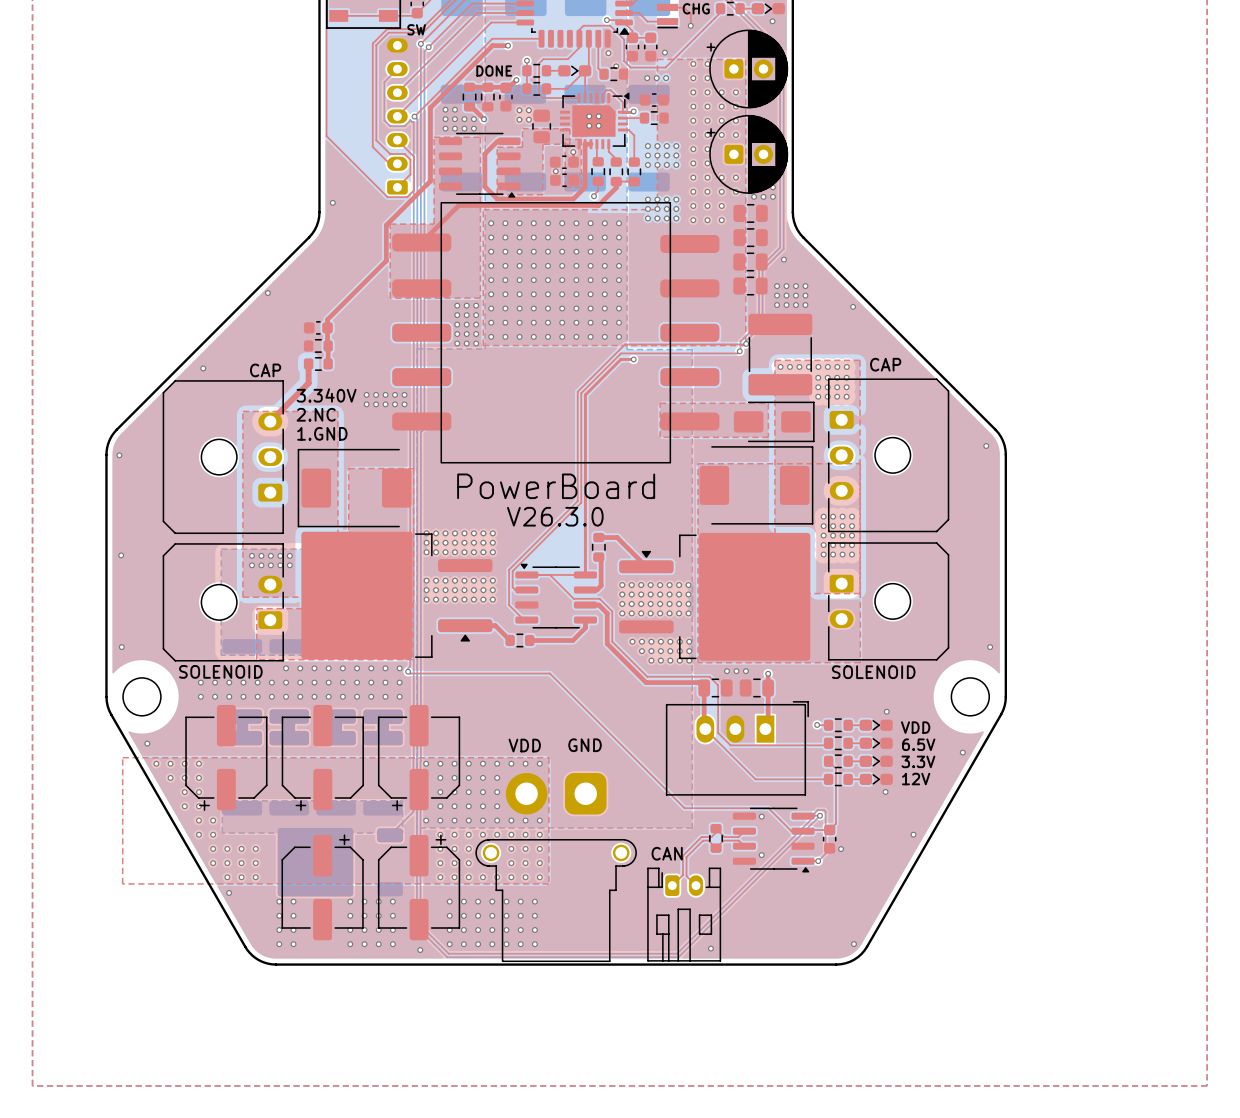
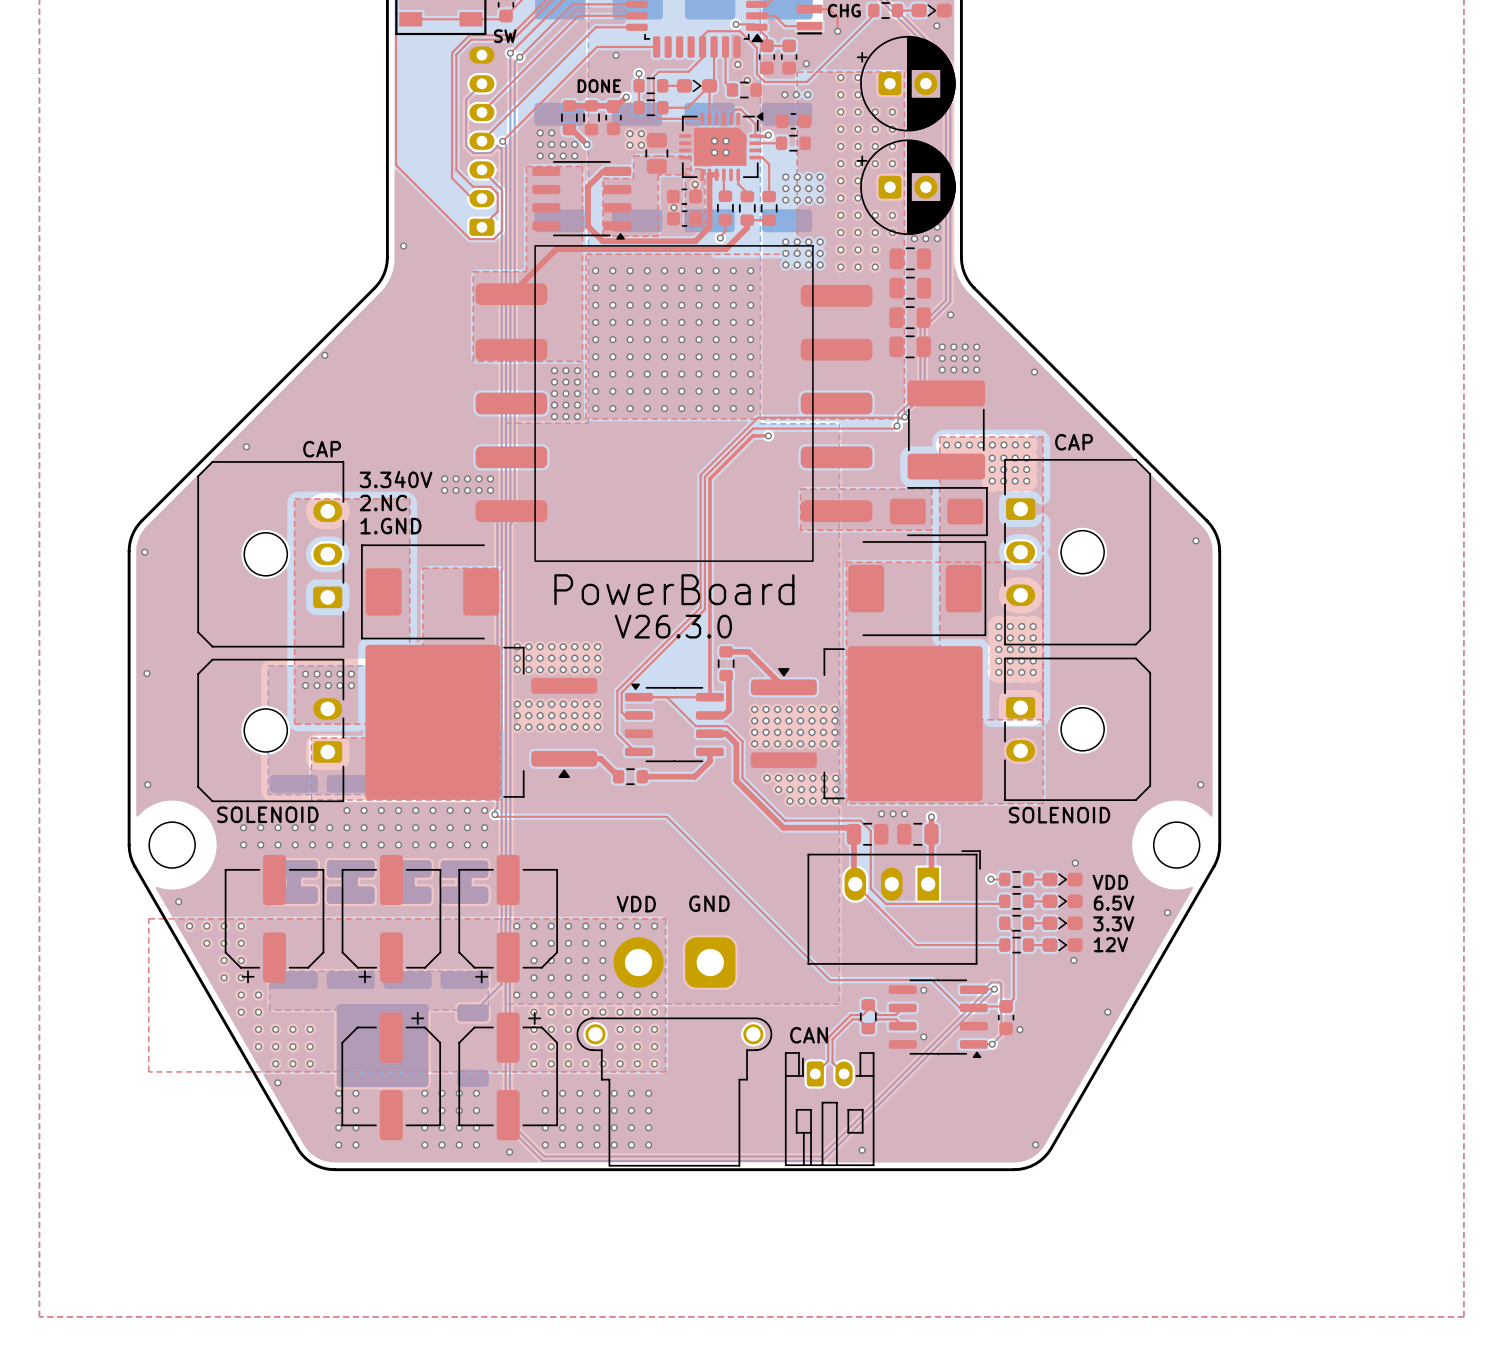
top track: (508, 45) (492, 45) (430, 107) (430, 181) (386, 225) (386, 260) (327, 319) (328, 363) -> none
part: (318, 327) -> none
part: (318, 345) -> none
top track: (308, 363) (308, 383) (270, 421) -> none
part: (318, 363) -> none

